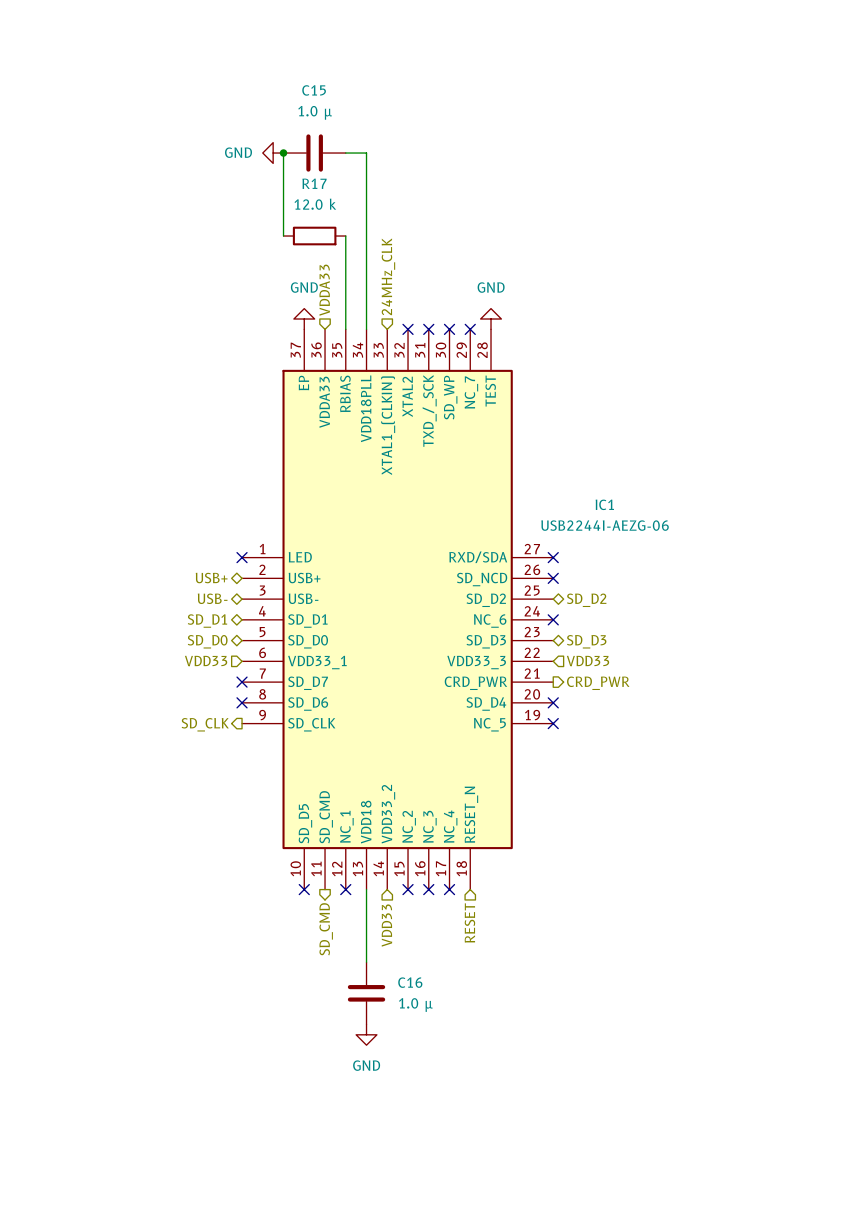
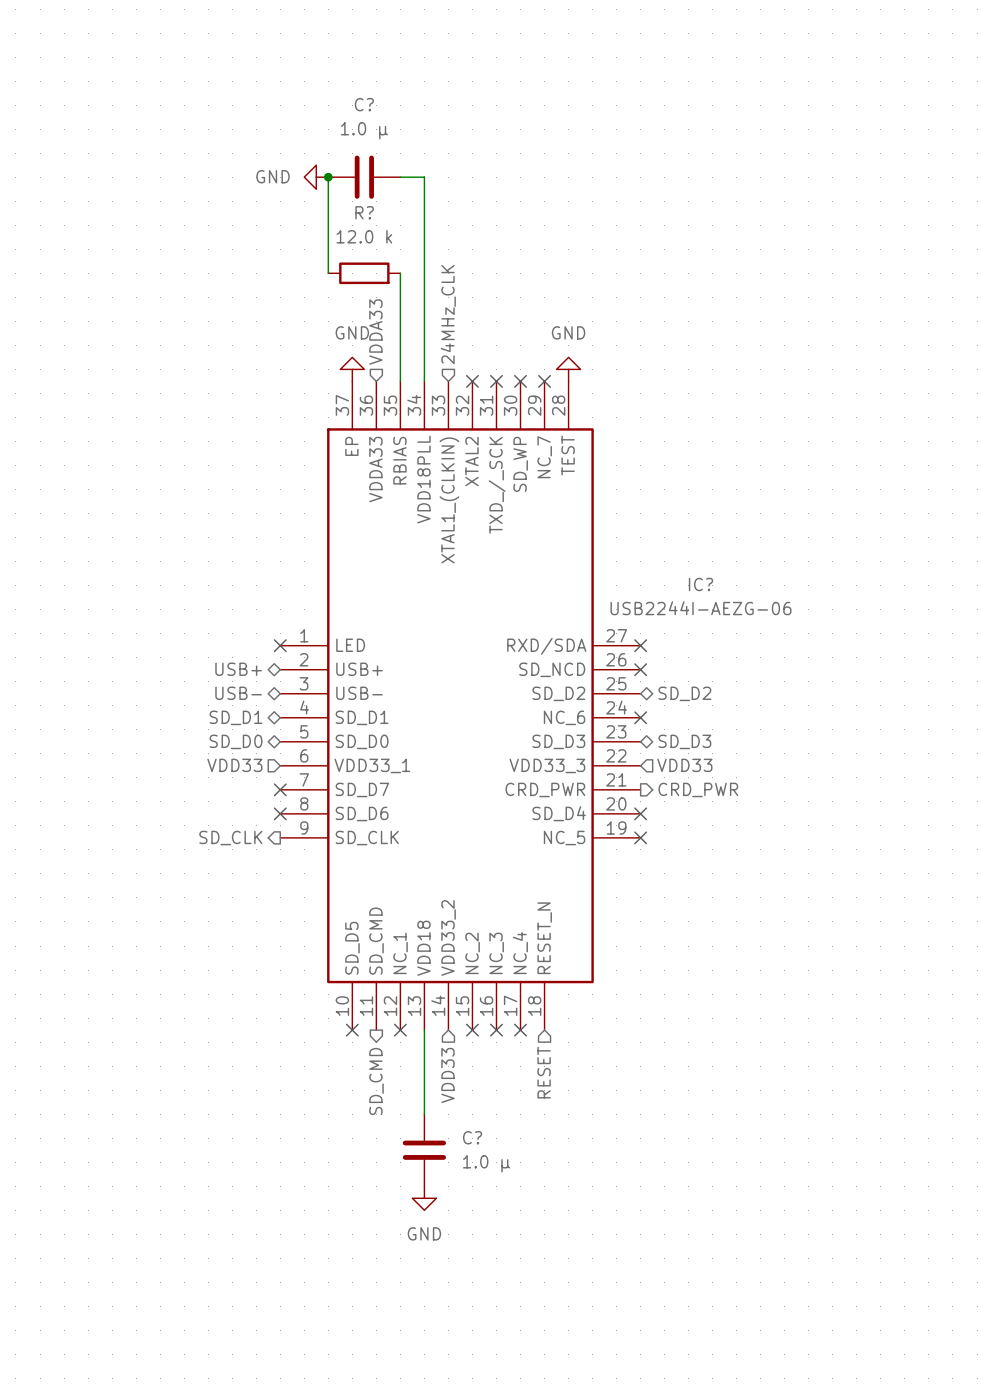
C15 name: C15 (314, 90) -> C? (364, 104)
R17 name: R17 (314, 183) -> R? (364, 212)
IC1 name: IC1 (604, 504) -> IC? (700, 584)
C16 name: C16 (410, 982) -> C? (472, 1137)

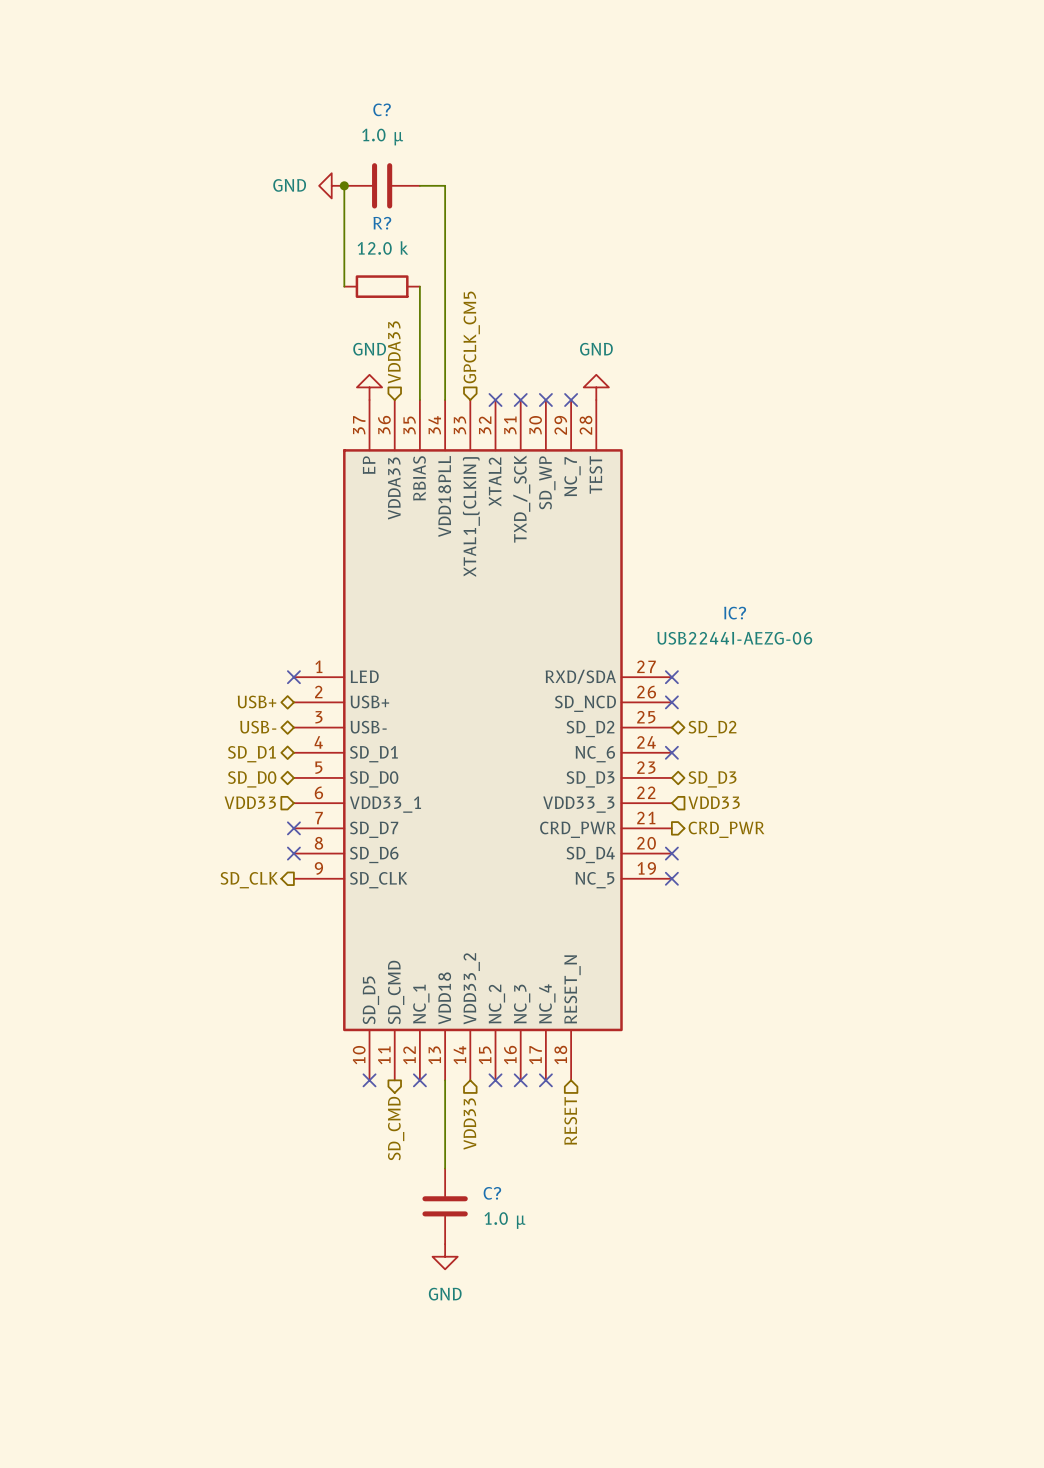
hierarchical label: 24MHz_CLK (448, 314) -> GPCLK_CM5 (471, 337)

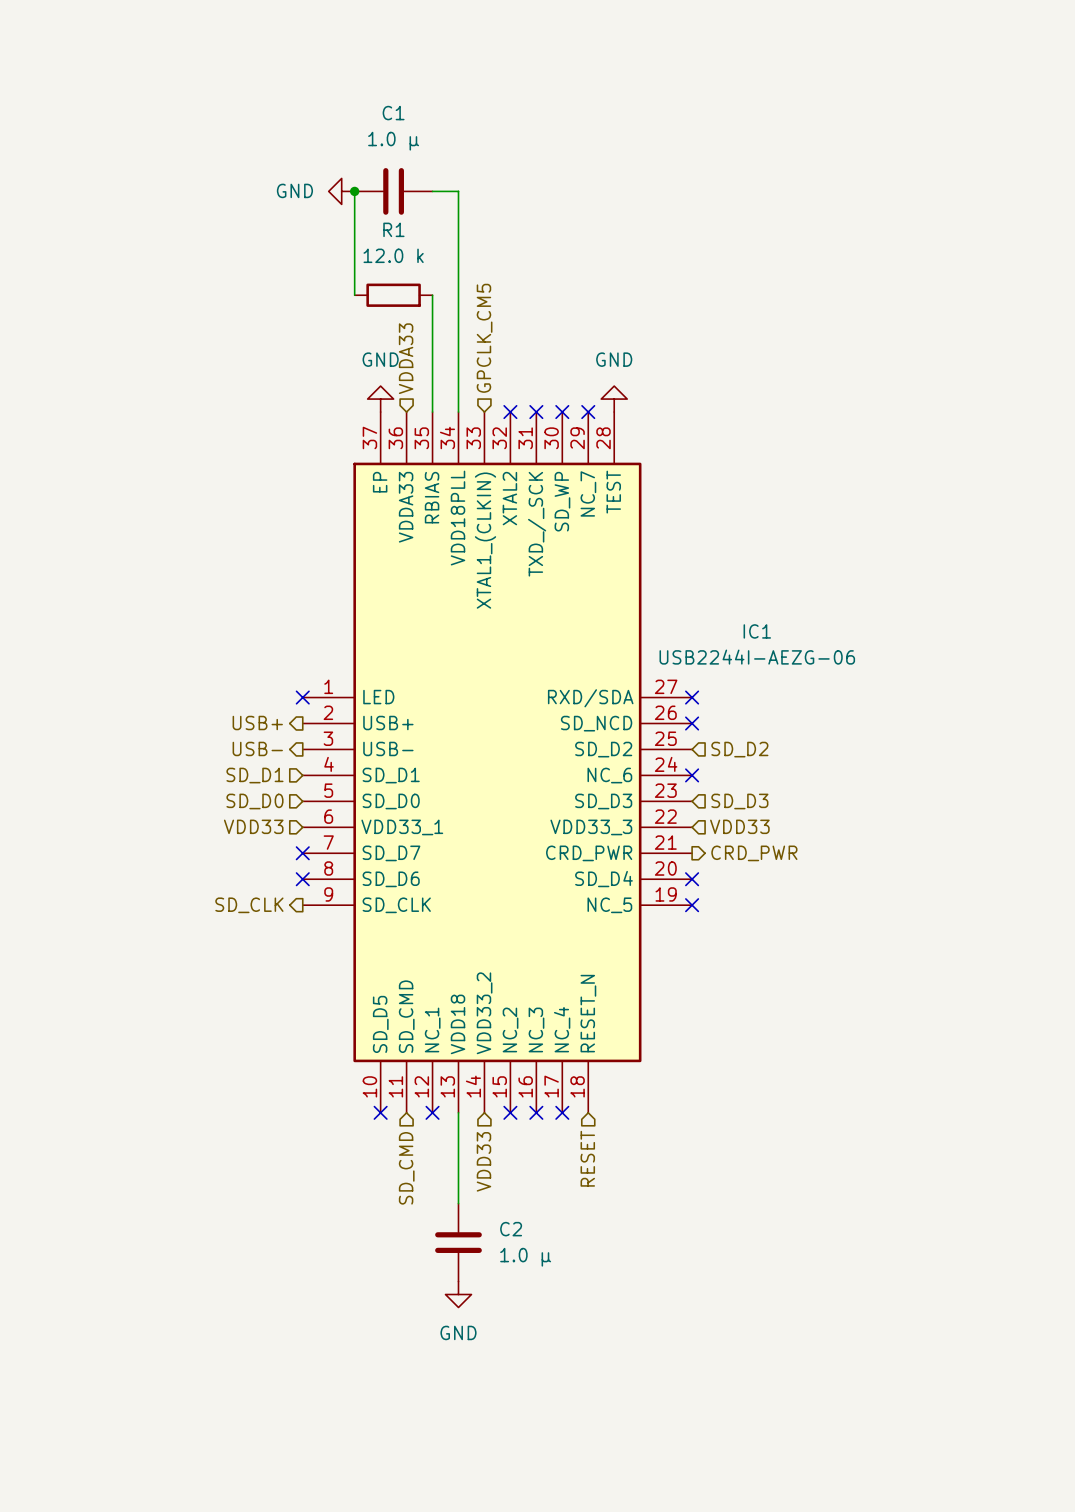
C? name: C? (382, 109) -> C1 (393, 113)
R? name: R? (382, 223) -> R1 (393, 229)
IC? name: IC? (735, 613) -> IC1 (757, 631)
hierarchical label shape: bidirectional (257, 701) -> output (257, 723)
hierarchical label shape: bidirectional (258, 727) -> output (257, 748)
hierarchical label shape: bidirectional (712, 729) -> input (739, 749)
hierarchical label shape: bidirectional (251, 754) -> input (254, 775)
hierarchical label shape: bidirectional (252, 779) -> input (254, 801)
hierarchical label shape: bidirectional (712, 779) -> input (739, 801)
hierarchical label shape: output (396, 1128) -> input (406, 1168)
C? name: C? (492, 1193) -> C2 (511, 1229)

